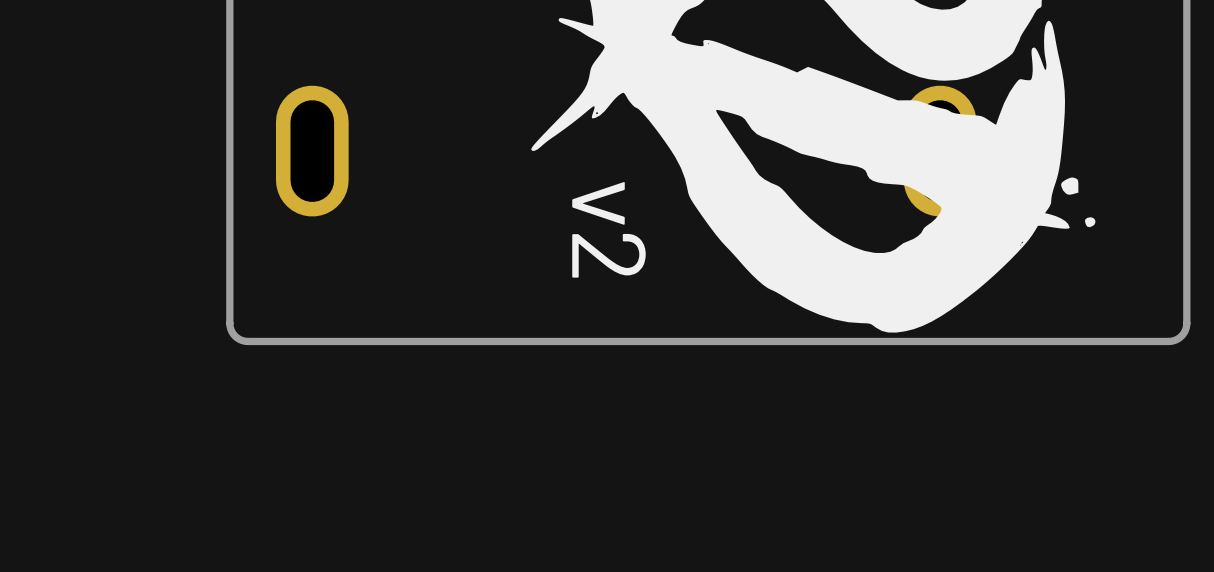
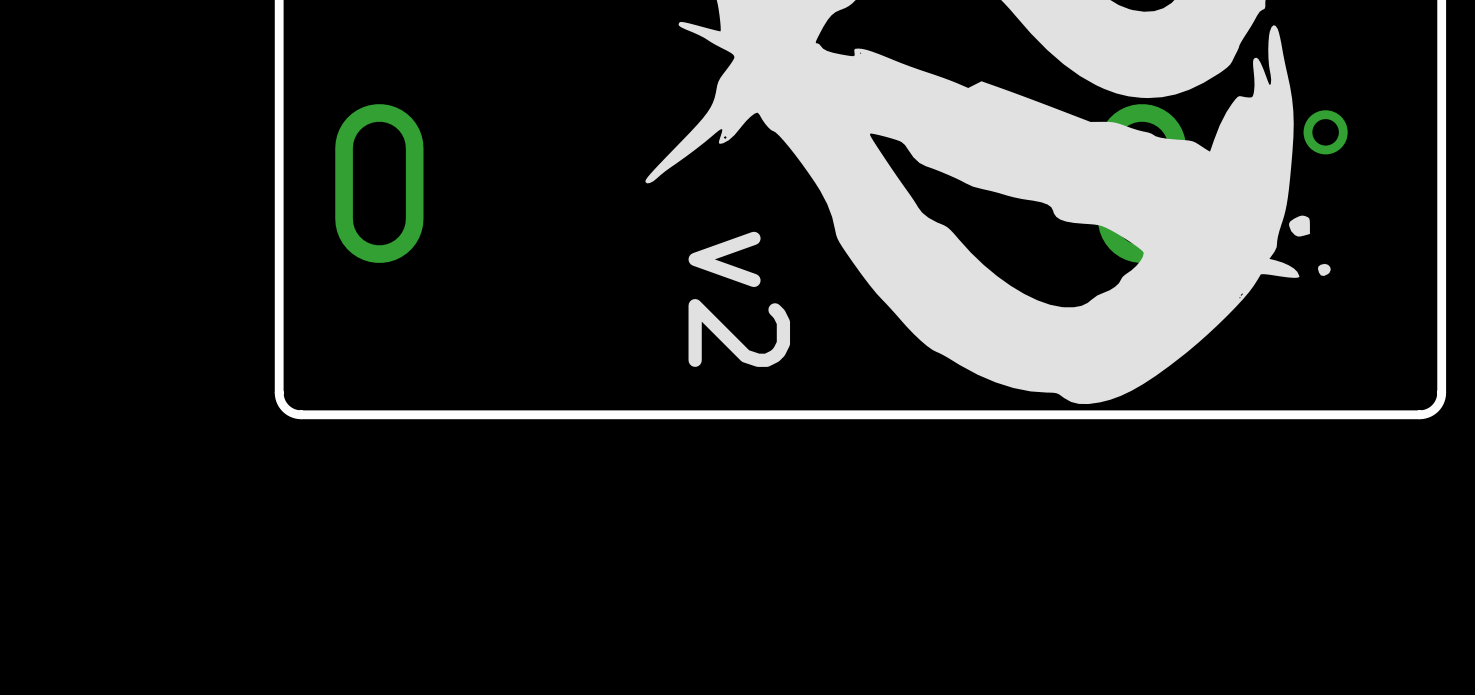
via: none -> (1325, 132)

